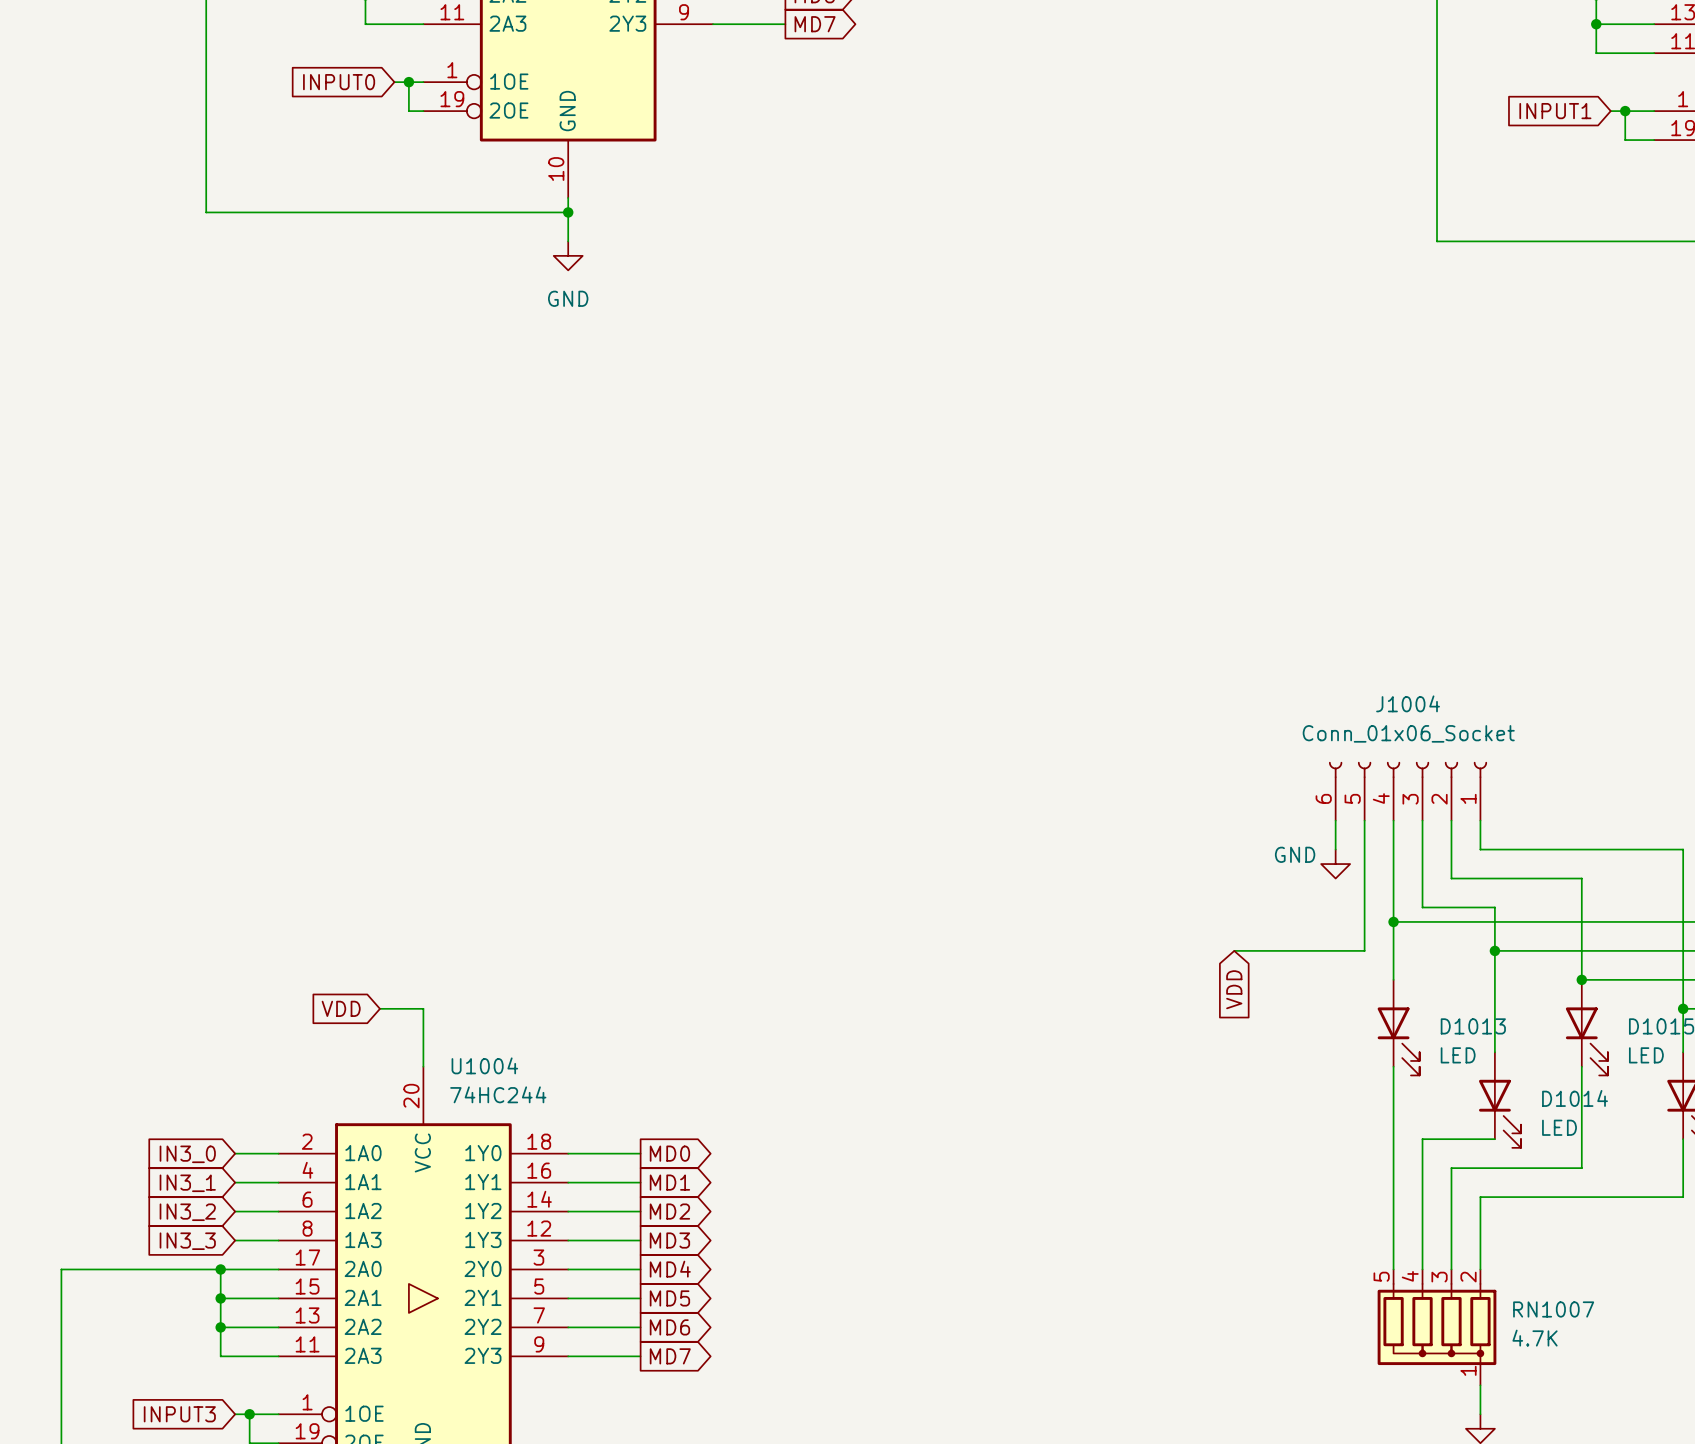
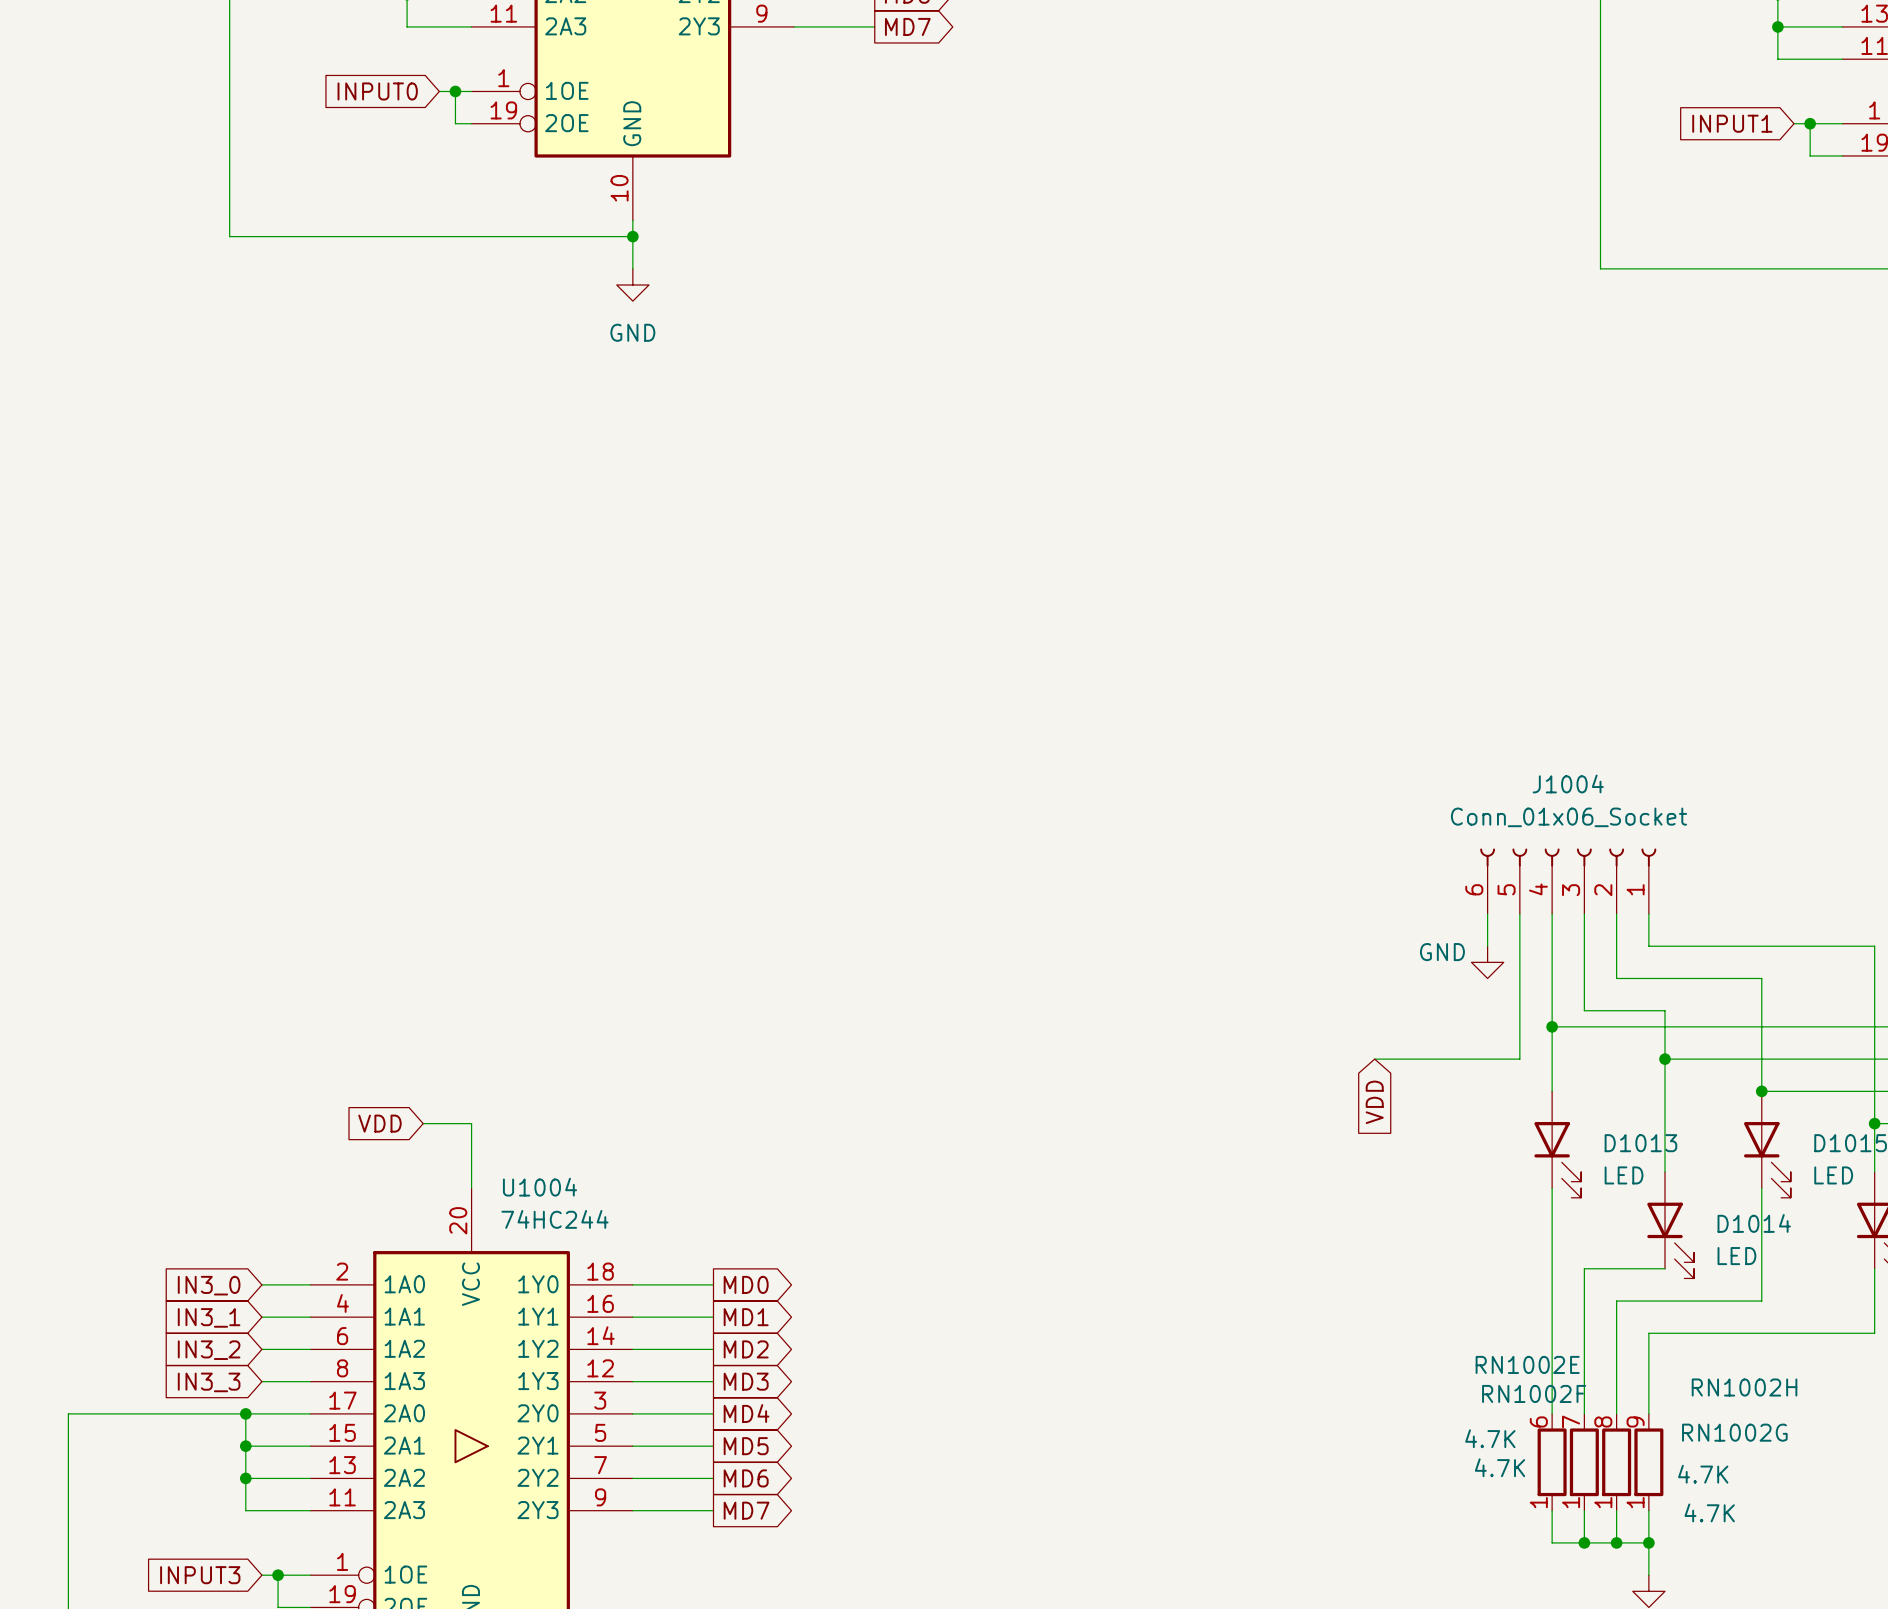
RN1002E: none -> 4.7K (1552, 1462)
RN1002F: none -> 4.7K (1584, 1462)
RN1002G: none -> 4.7K (1616, 1462)
RN1002H: none -> 4.7K (1648, 1462)
RN1007: 4.7K (1437, 1327) -> none
wire: none -> (1552, 1510) (1552, 1542) (1648, 1542) (1648, 1510)
wire: none -> (1584, 1510) (1584, 1542)
wire: none -> (1616, 1510) (1616, 1542)
junction: none -> (1584, 1542)
junction: none -> (1616, 1542)
junction: none -> (1648, 1542)

